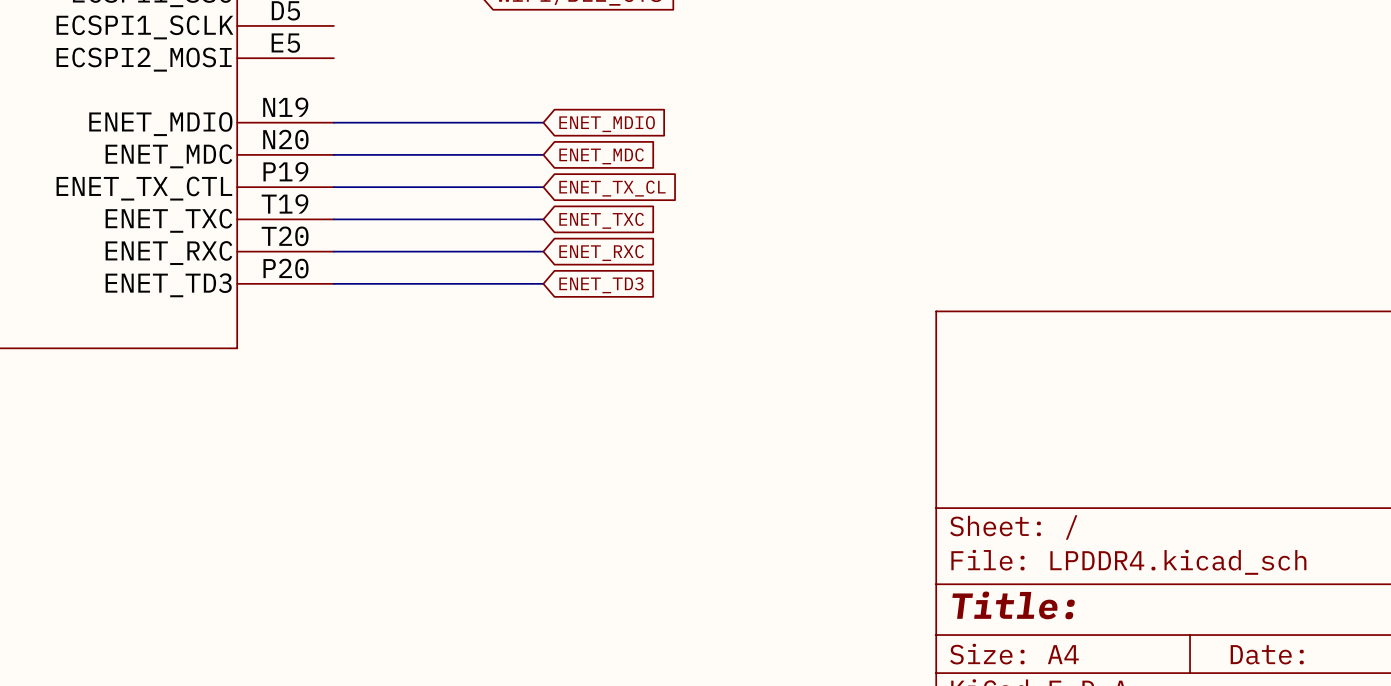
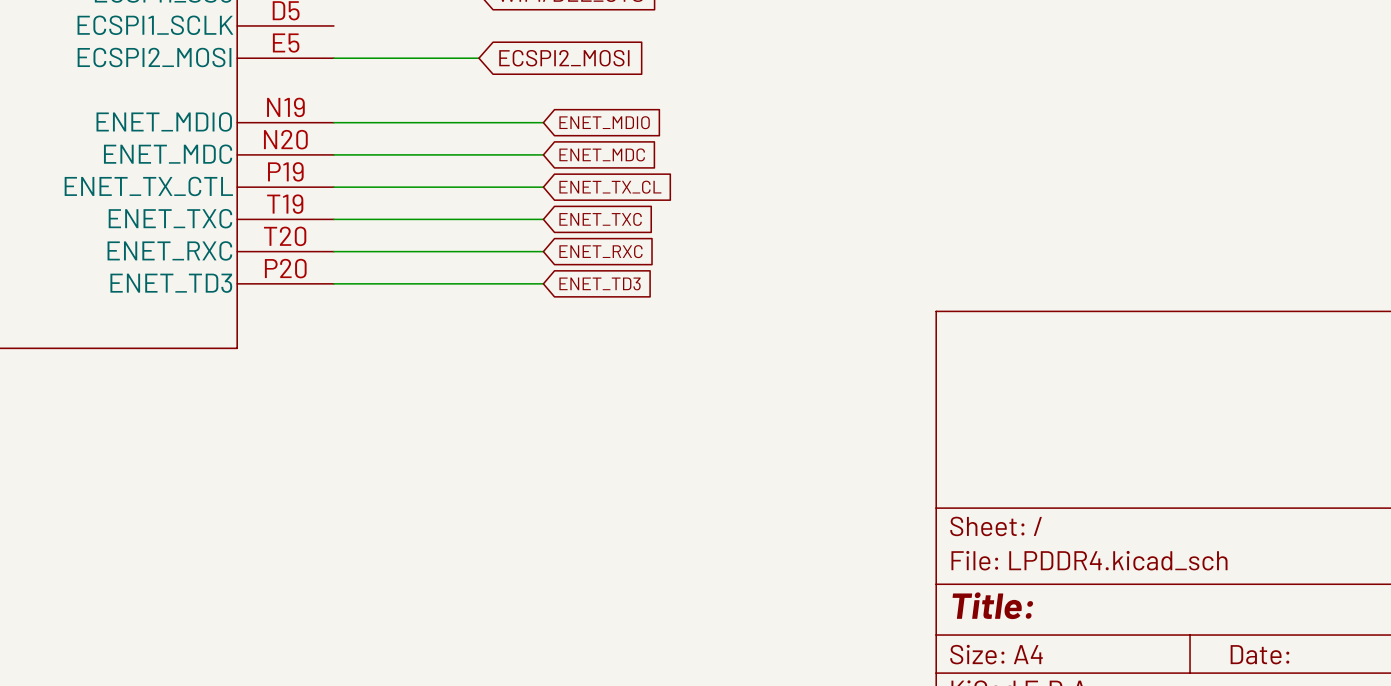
wire: none -> (333, 58) (478, 58)
global label: none -> ECSPI2_MOSI (564, 58)

